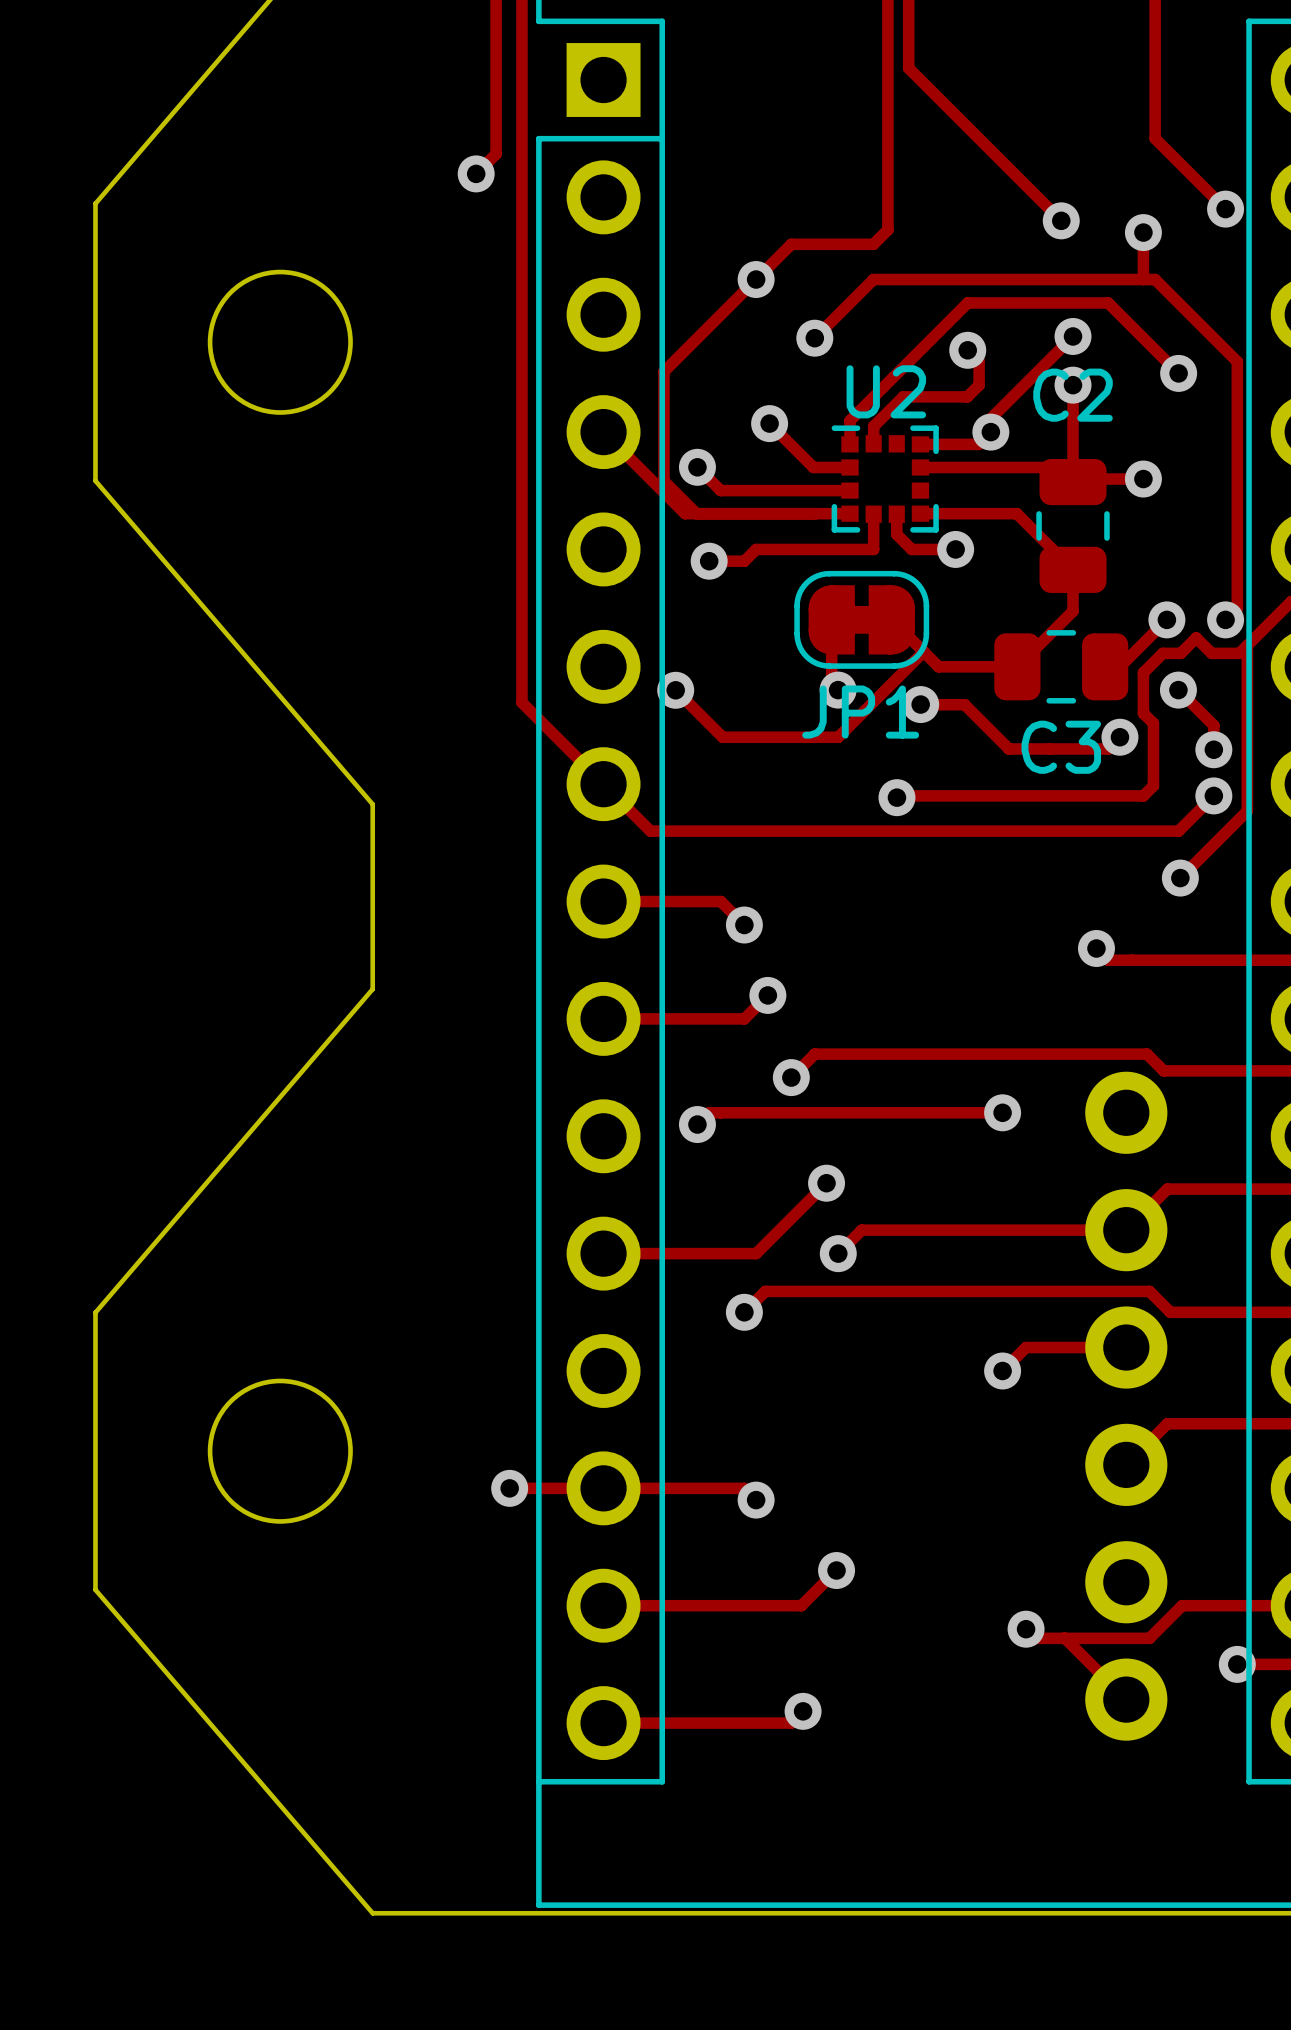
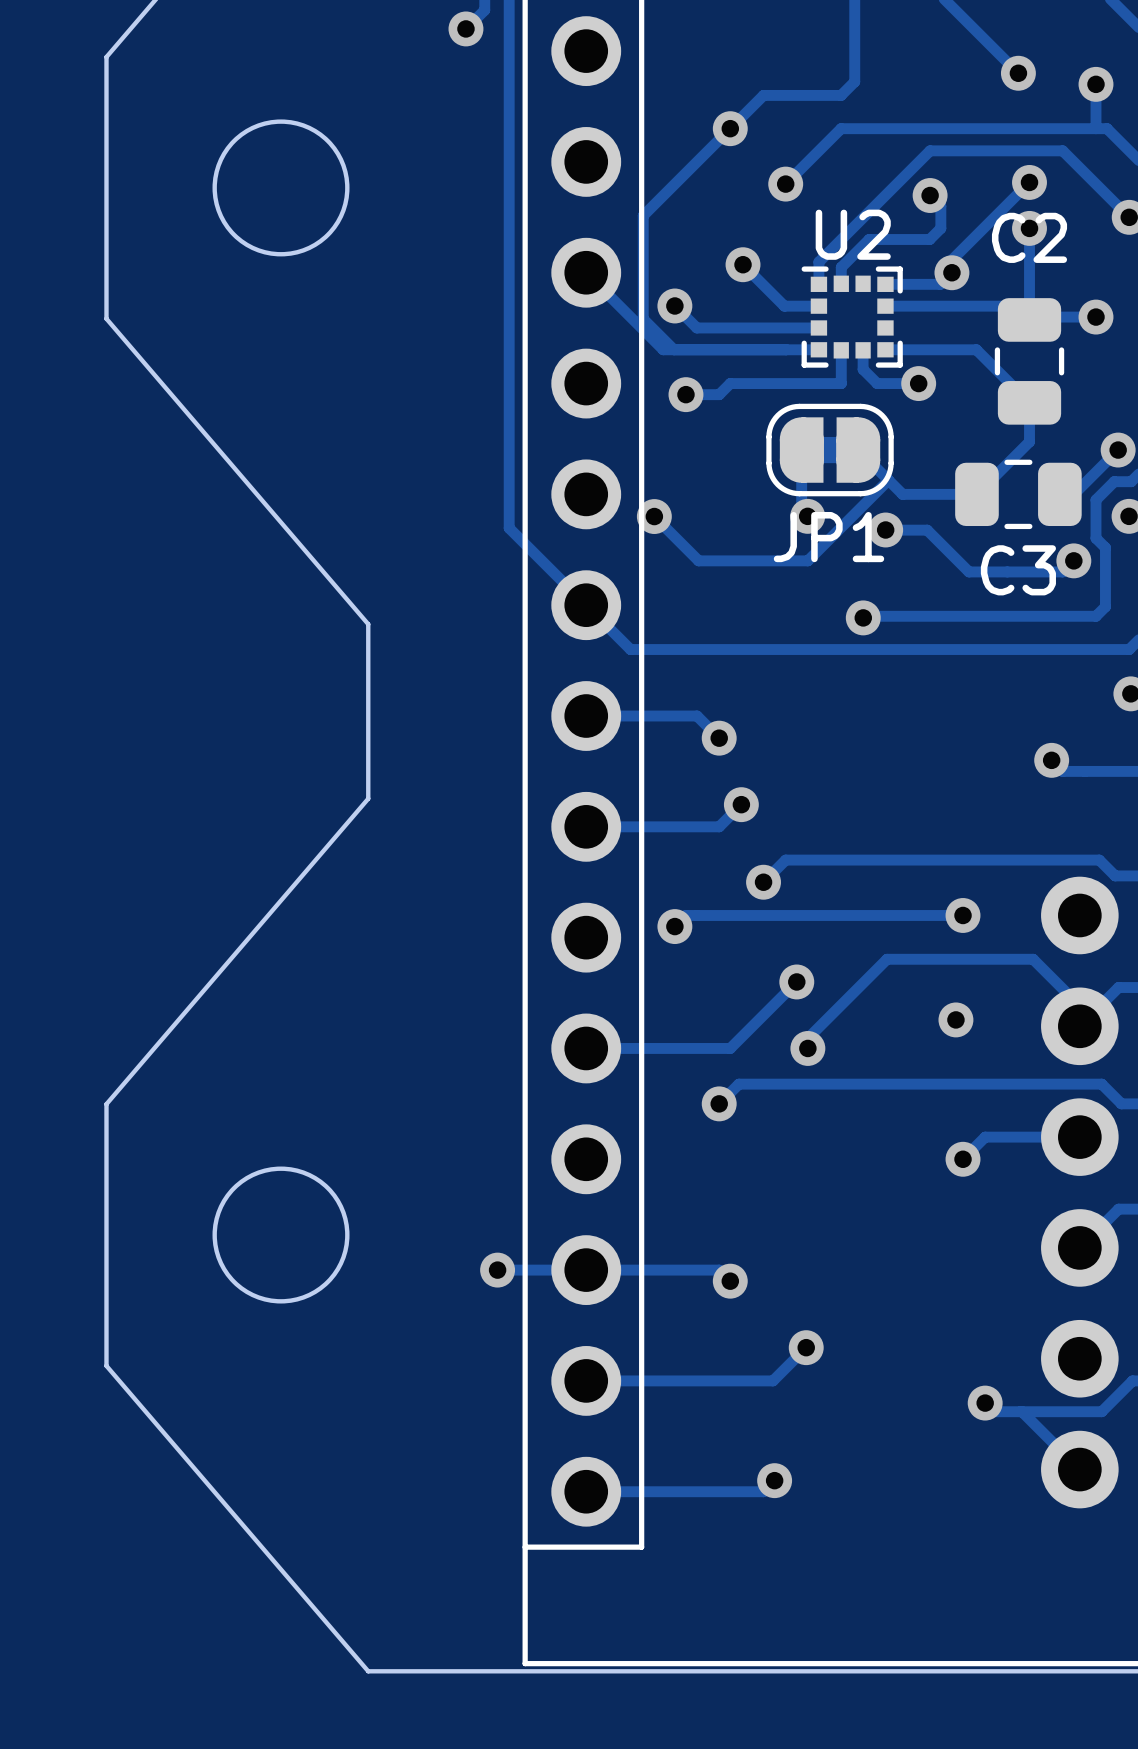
via: none -> (955, 1019)
track: (1126, 1230) (861, 1230) (838, 1253) -> (1079, 1026) (1079, 1005) (1033, 959) (887, 959) (807, 1038) (807, 1048)

